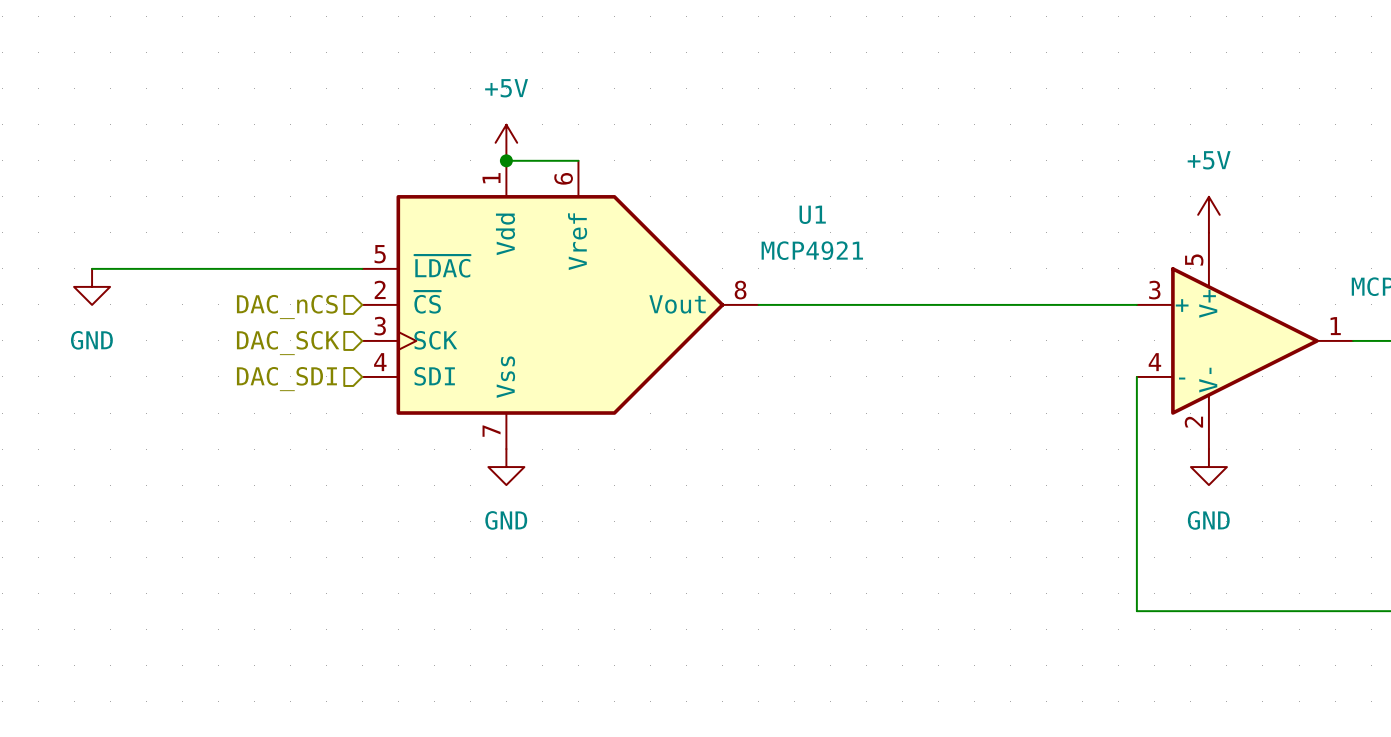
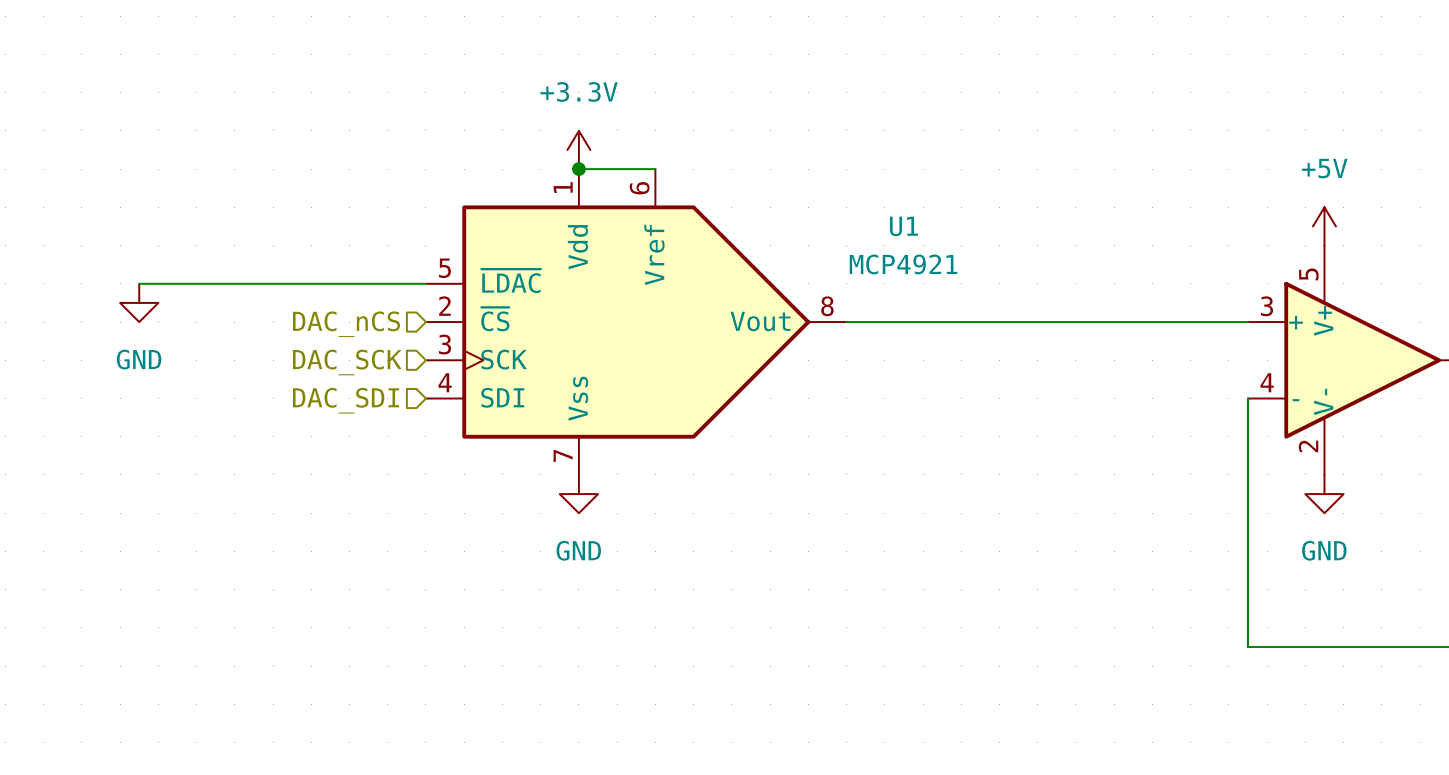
power symbol: +5V (506, 142) -> +3.3V (578, 150)

